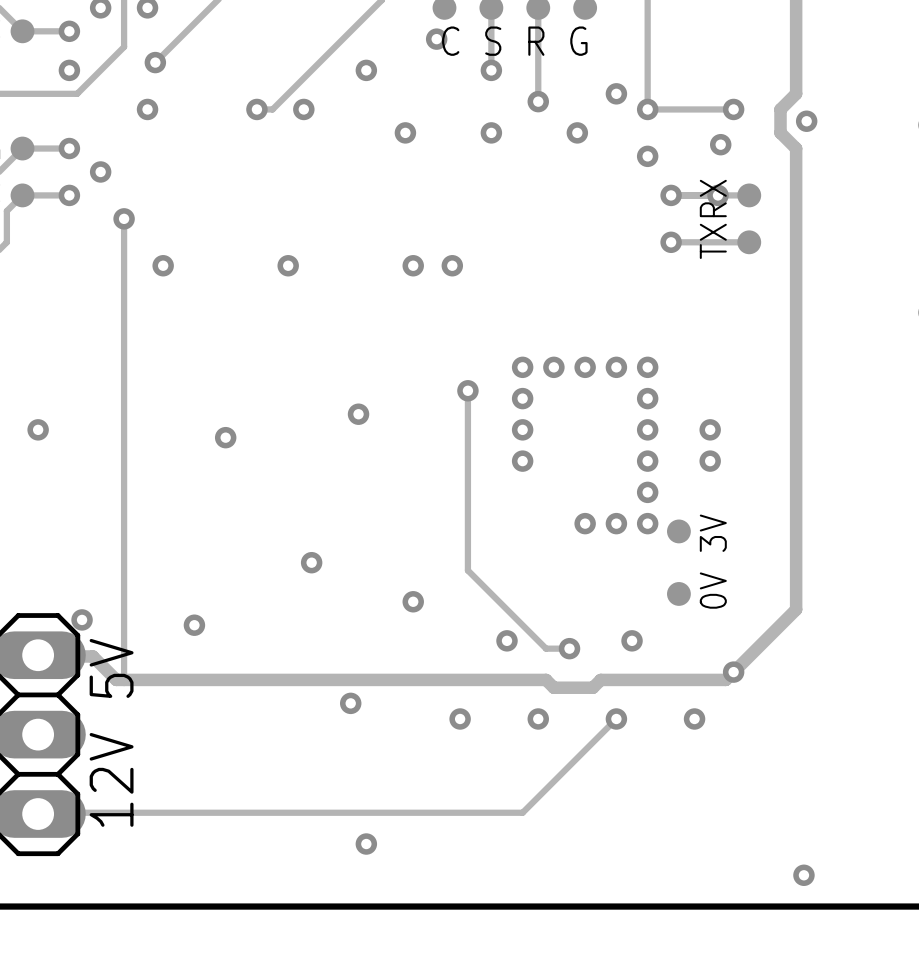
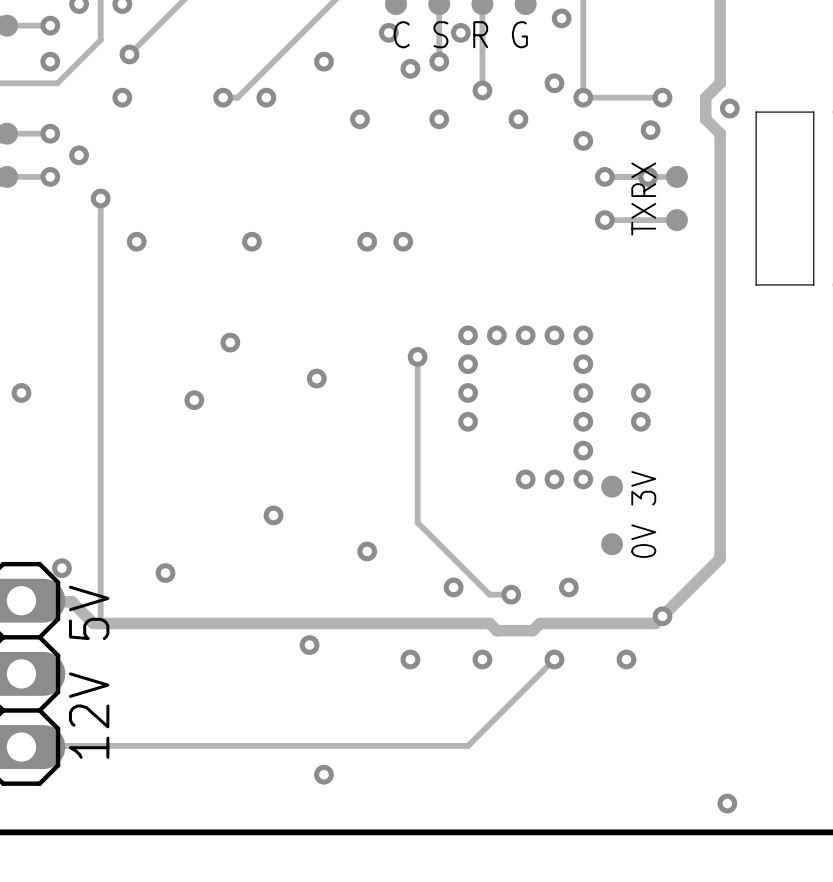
via: none -> (561, 18)
via: none -> (460, 32)
via: none -> (410, 68)
board edge: none -> (756, 112) (813, 112) (813, 284) (756, 284) (756, 112)
via: none -> (230, 342)

